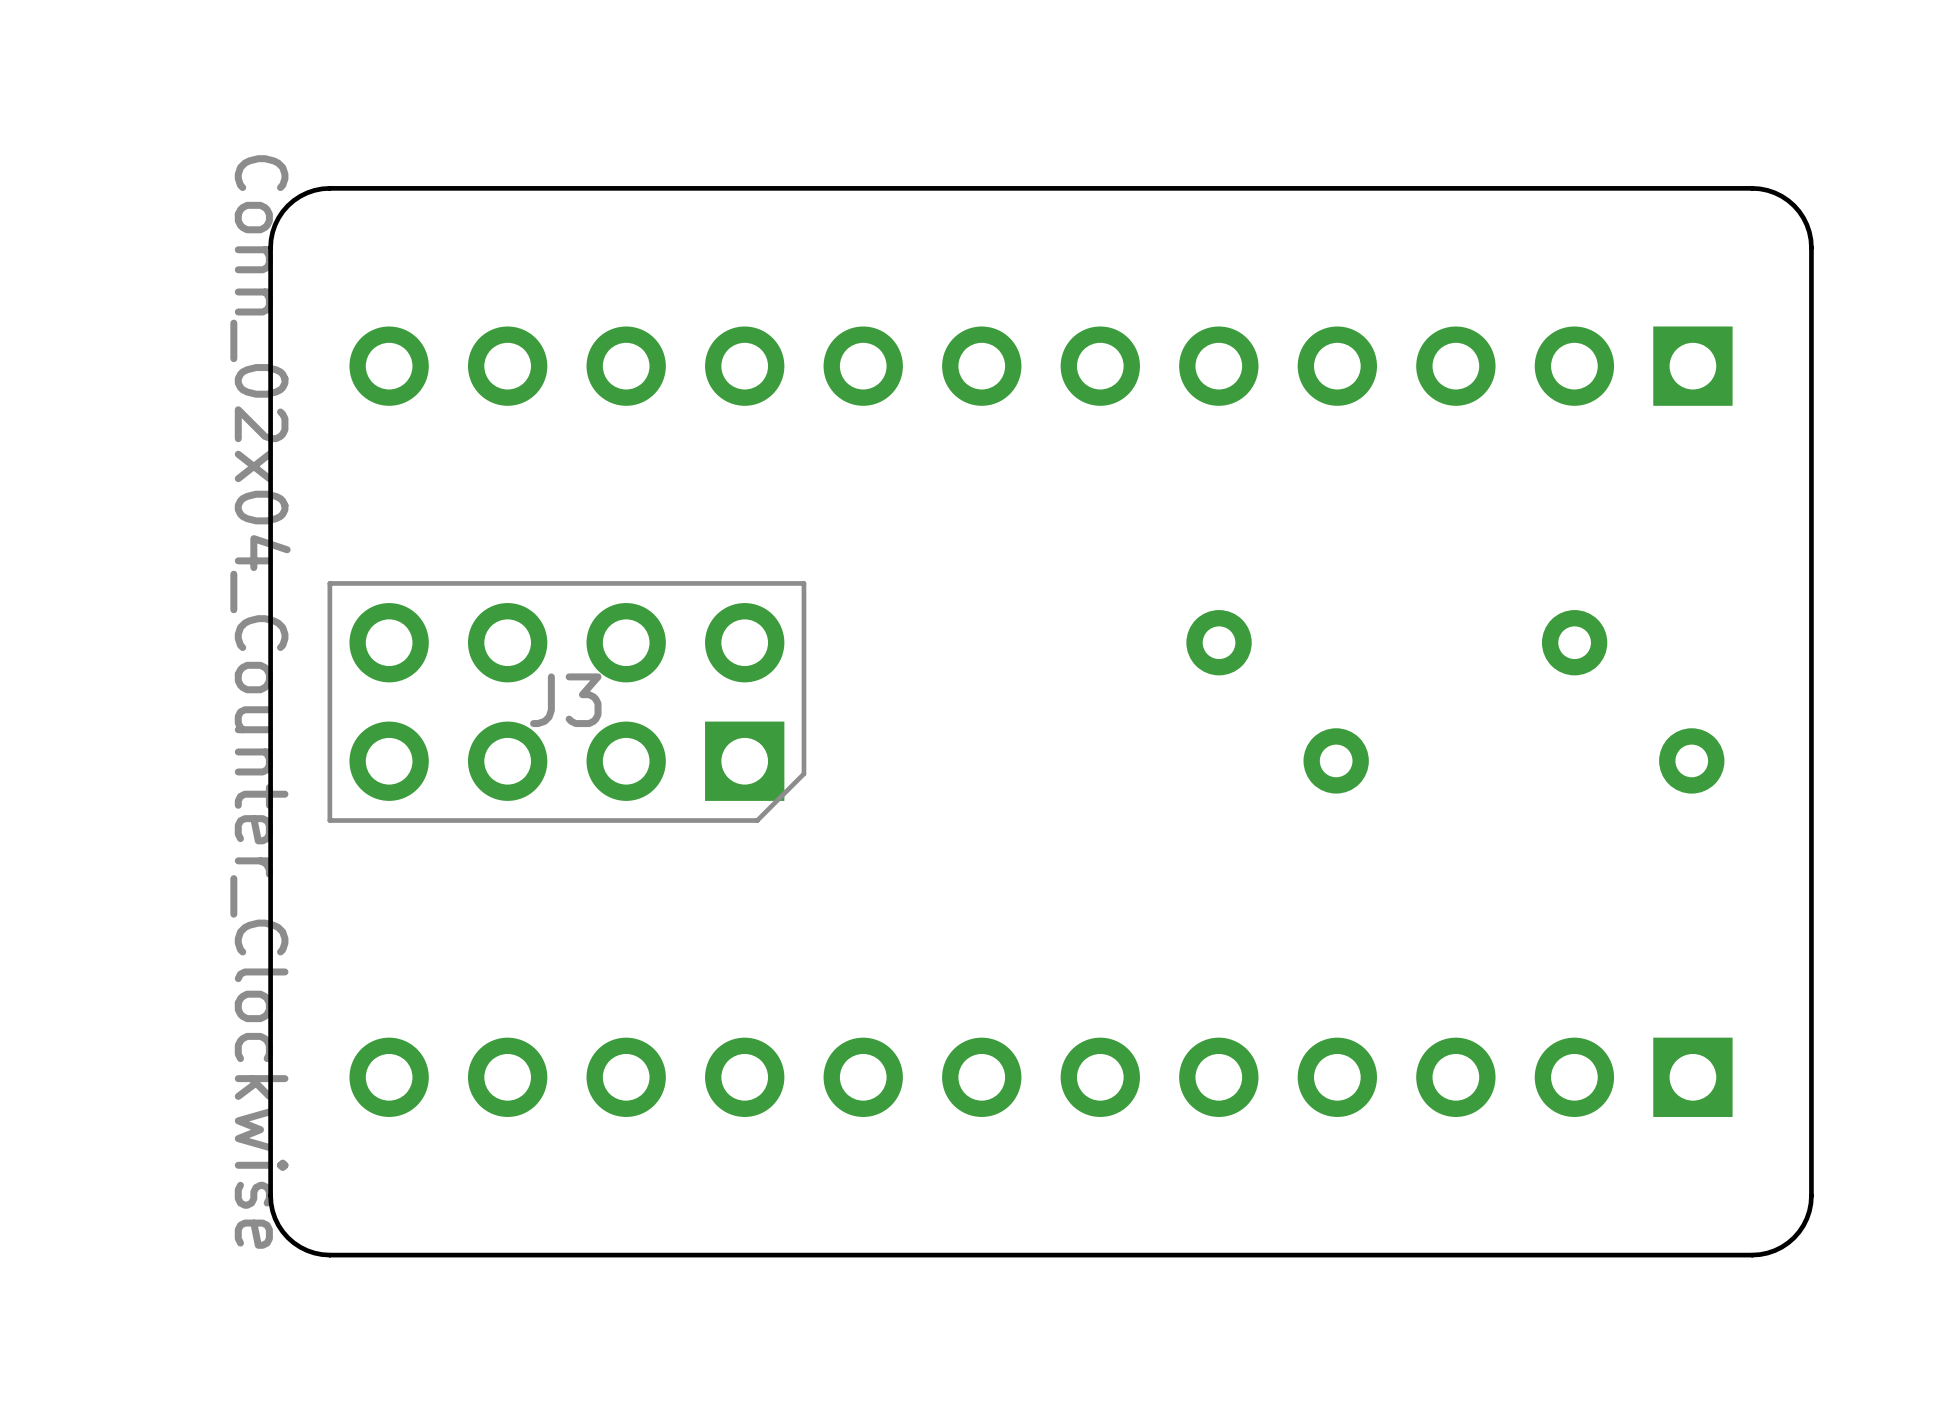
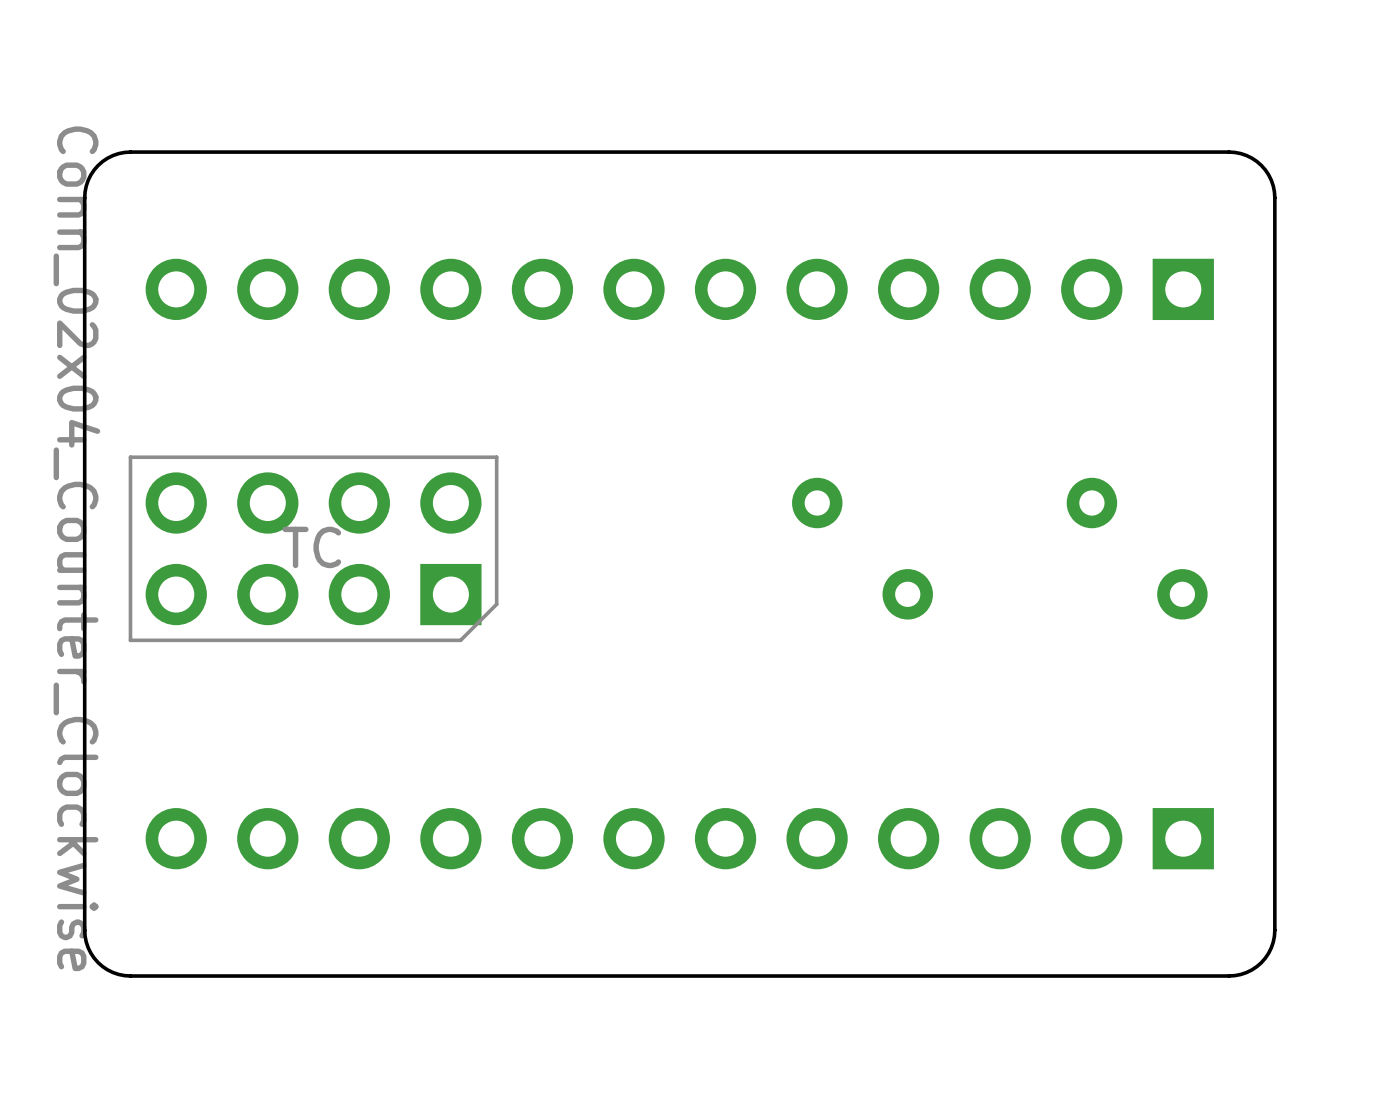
J3 name: J3 (565, 700) -> TC (311, 547)

